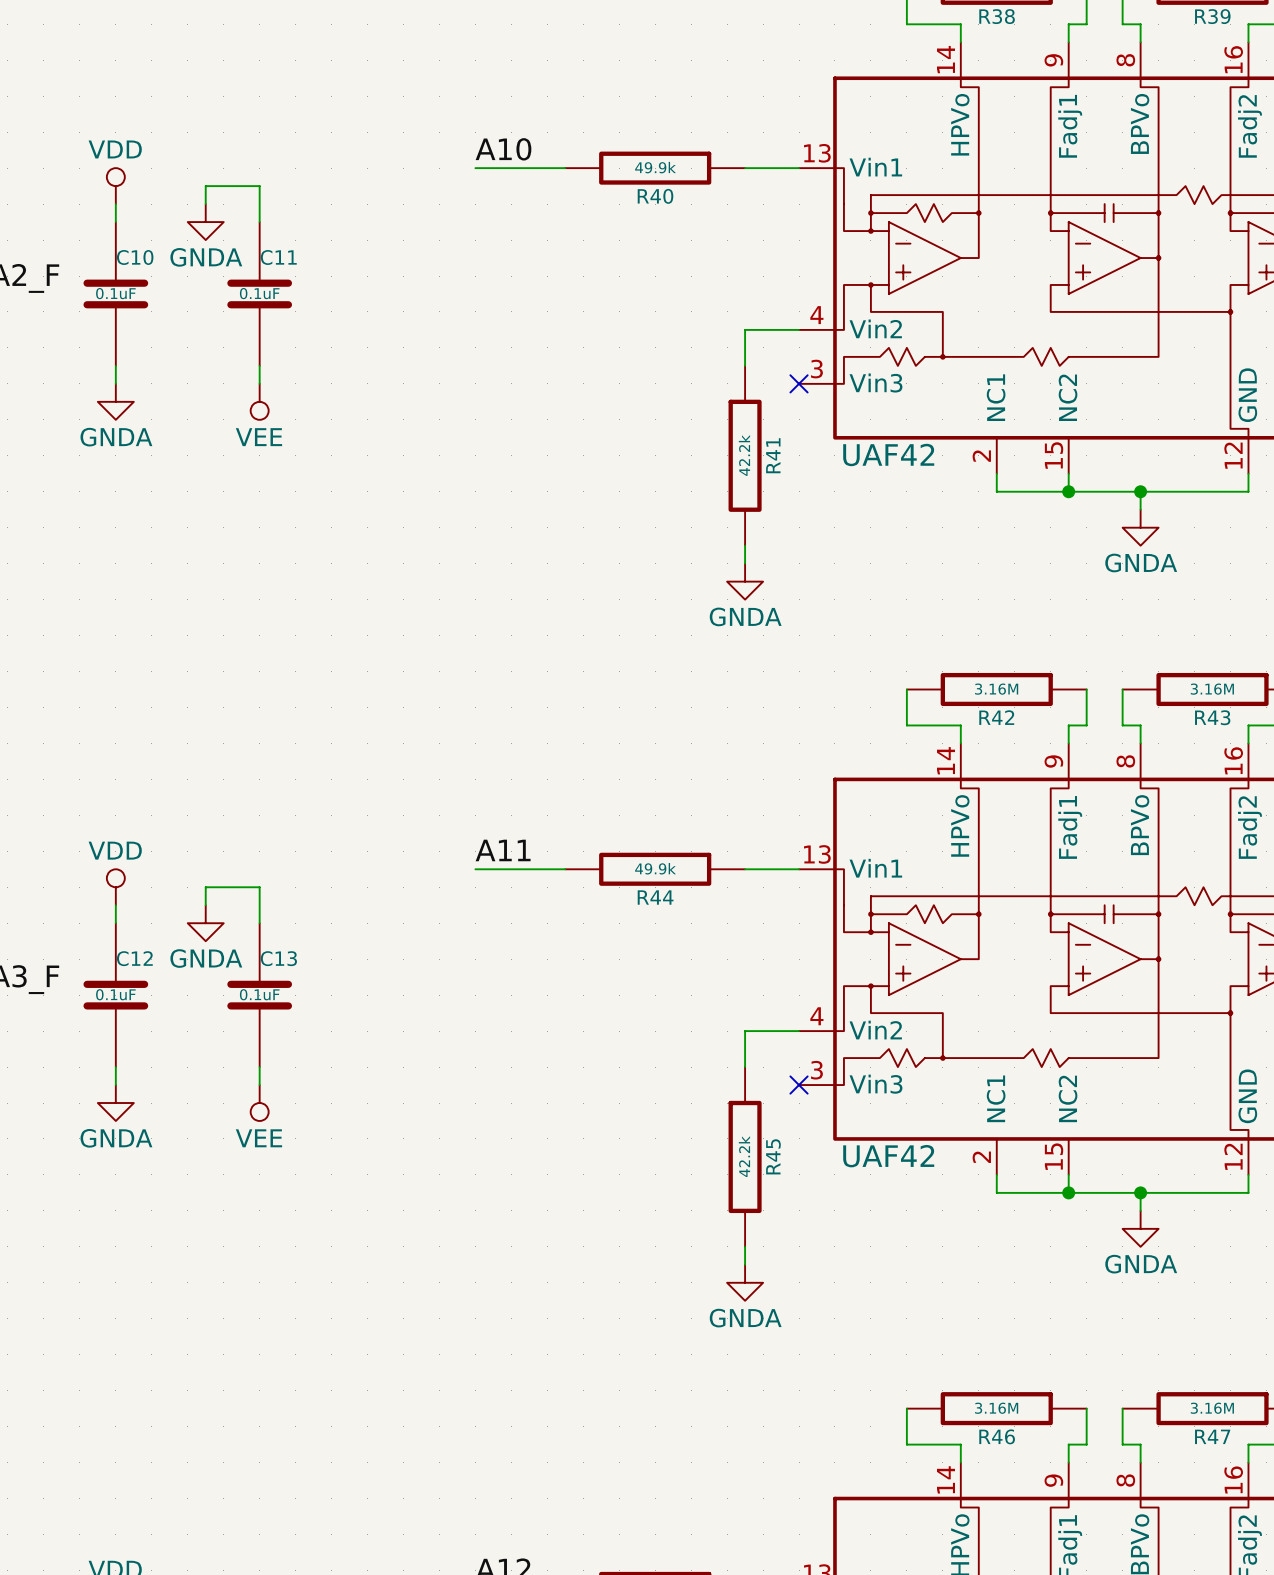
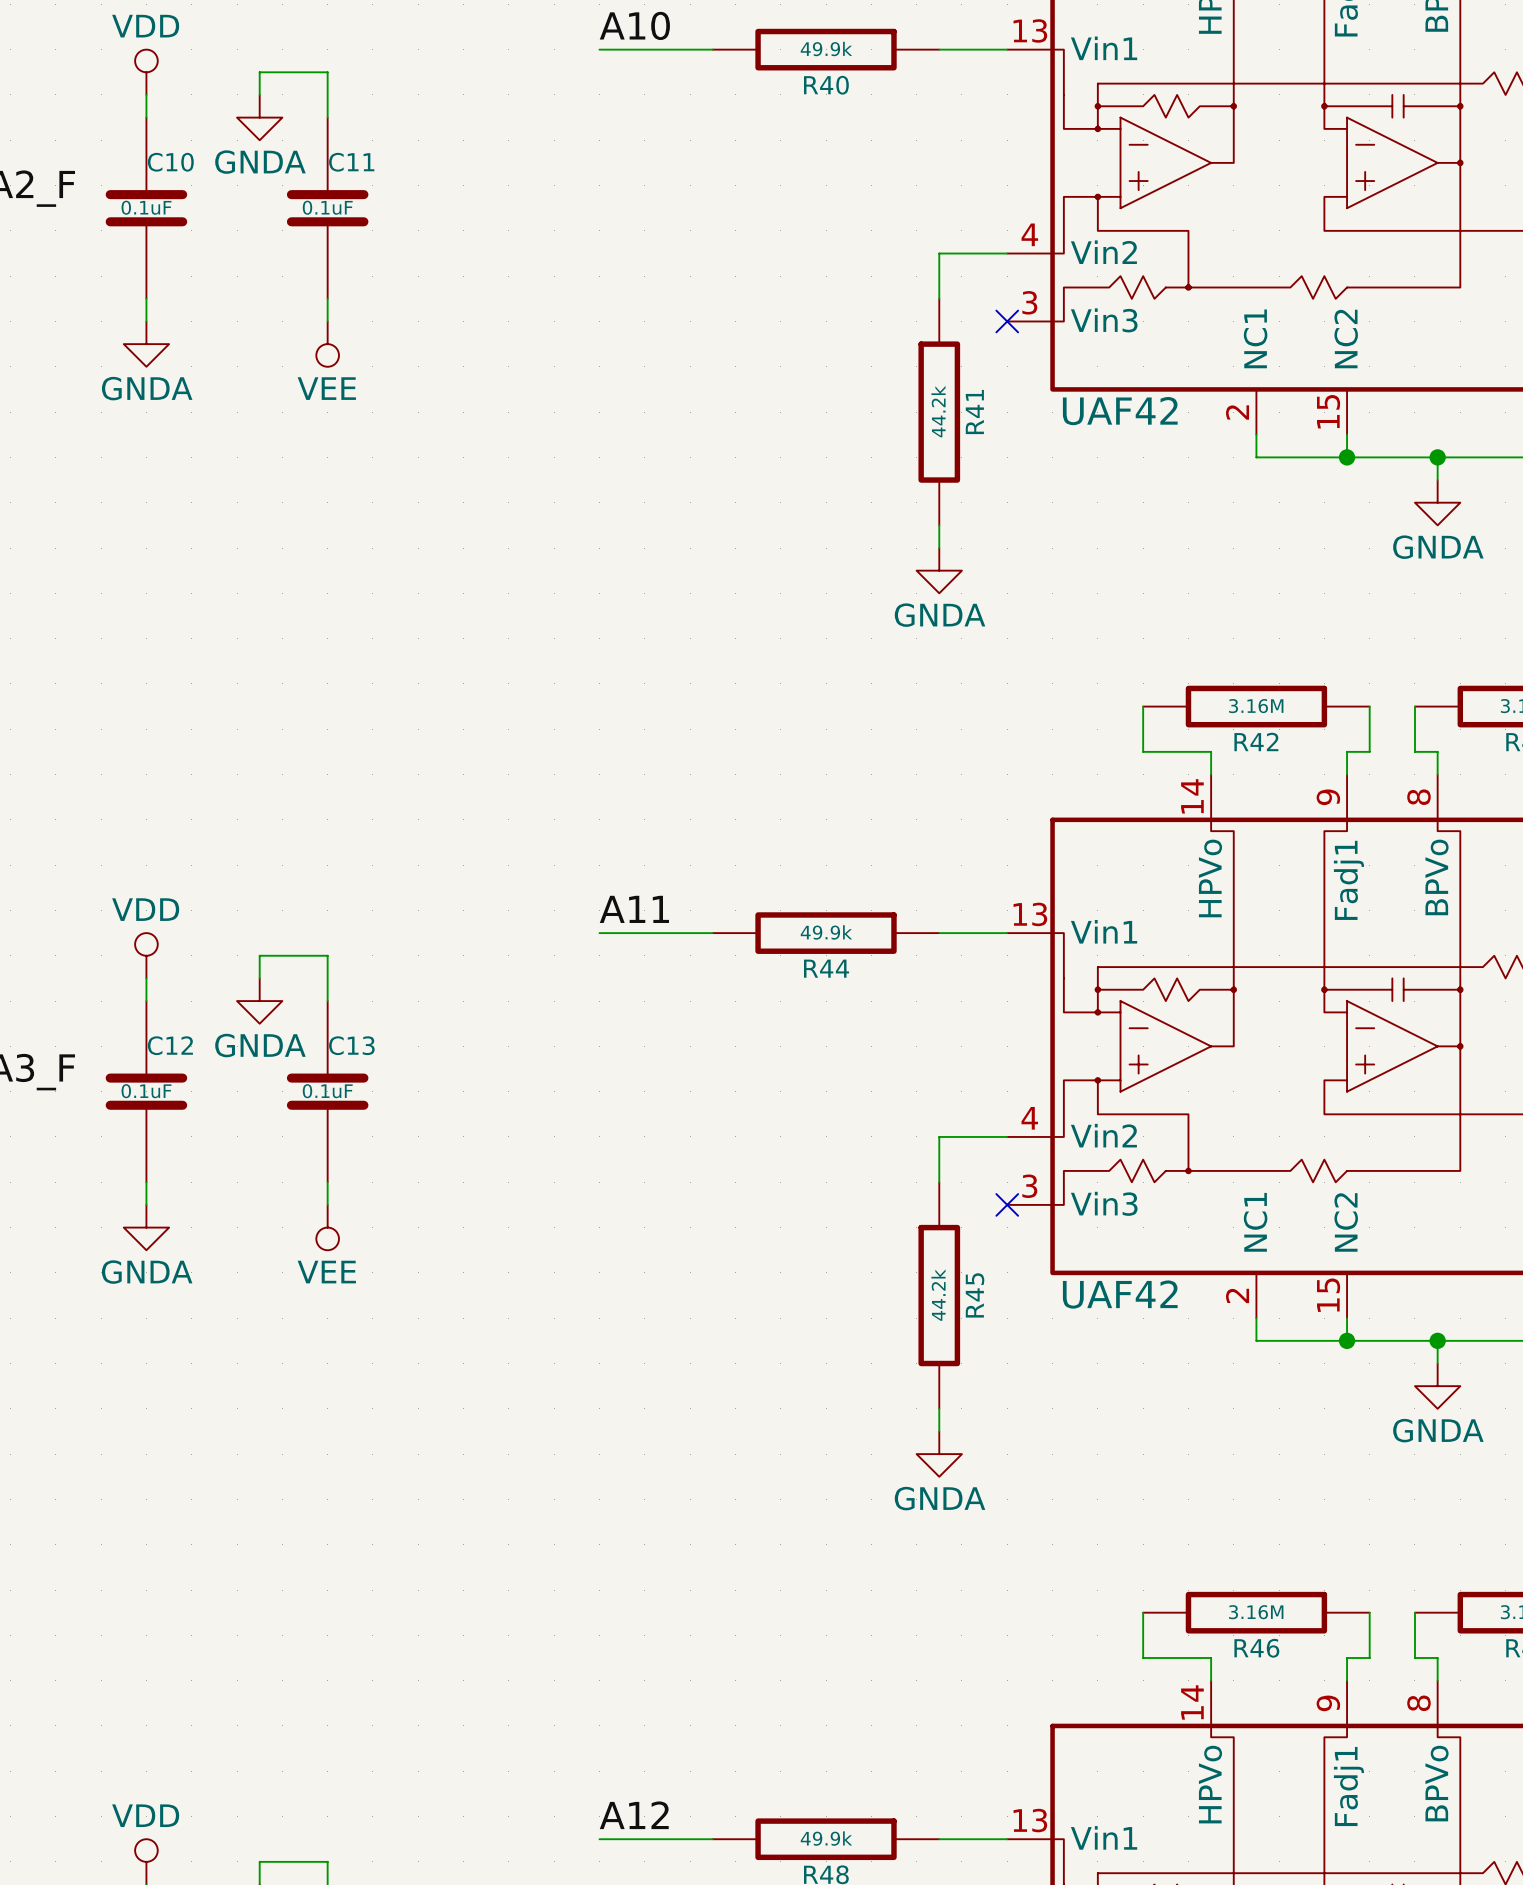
R41 value: 42.2k (744, 455) -> 44.2k (938, 411)
R45 value: 42.2k (744, 1156) -> 44.2k (938, 1295)

